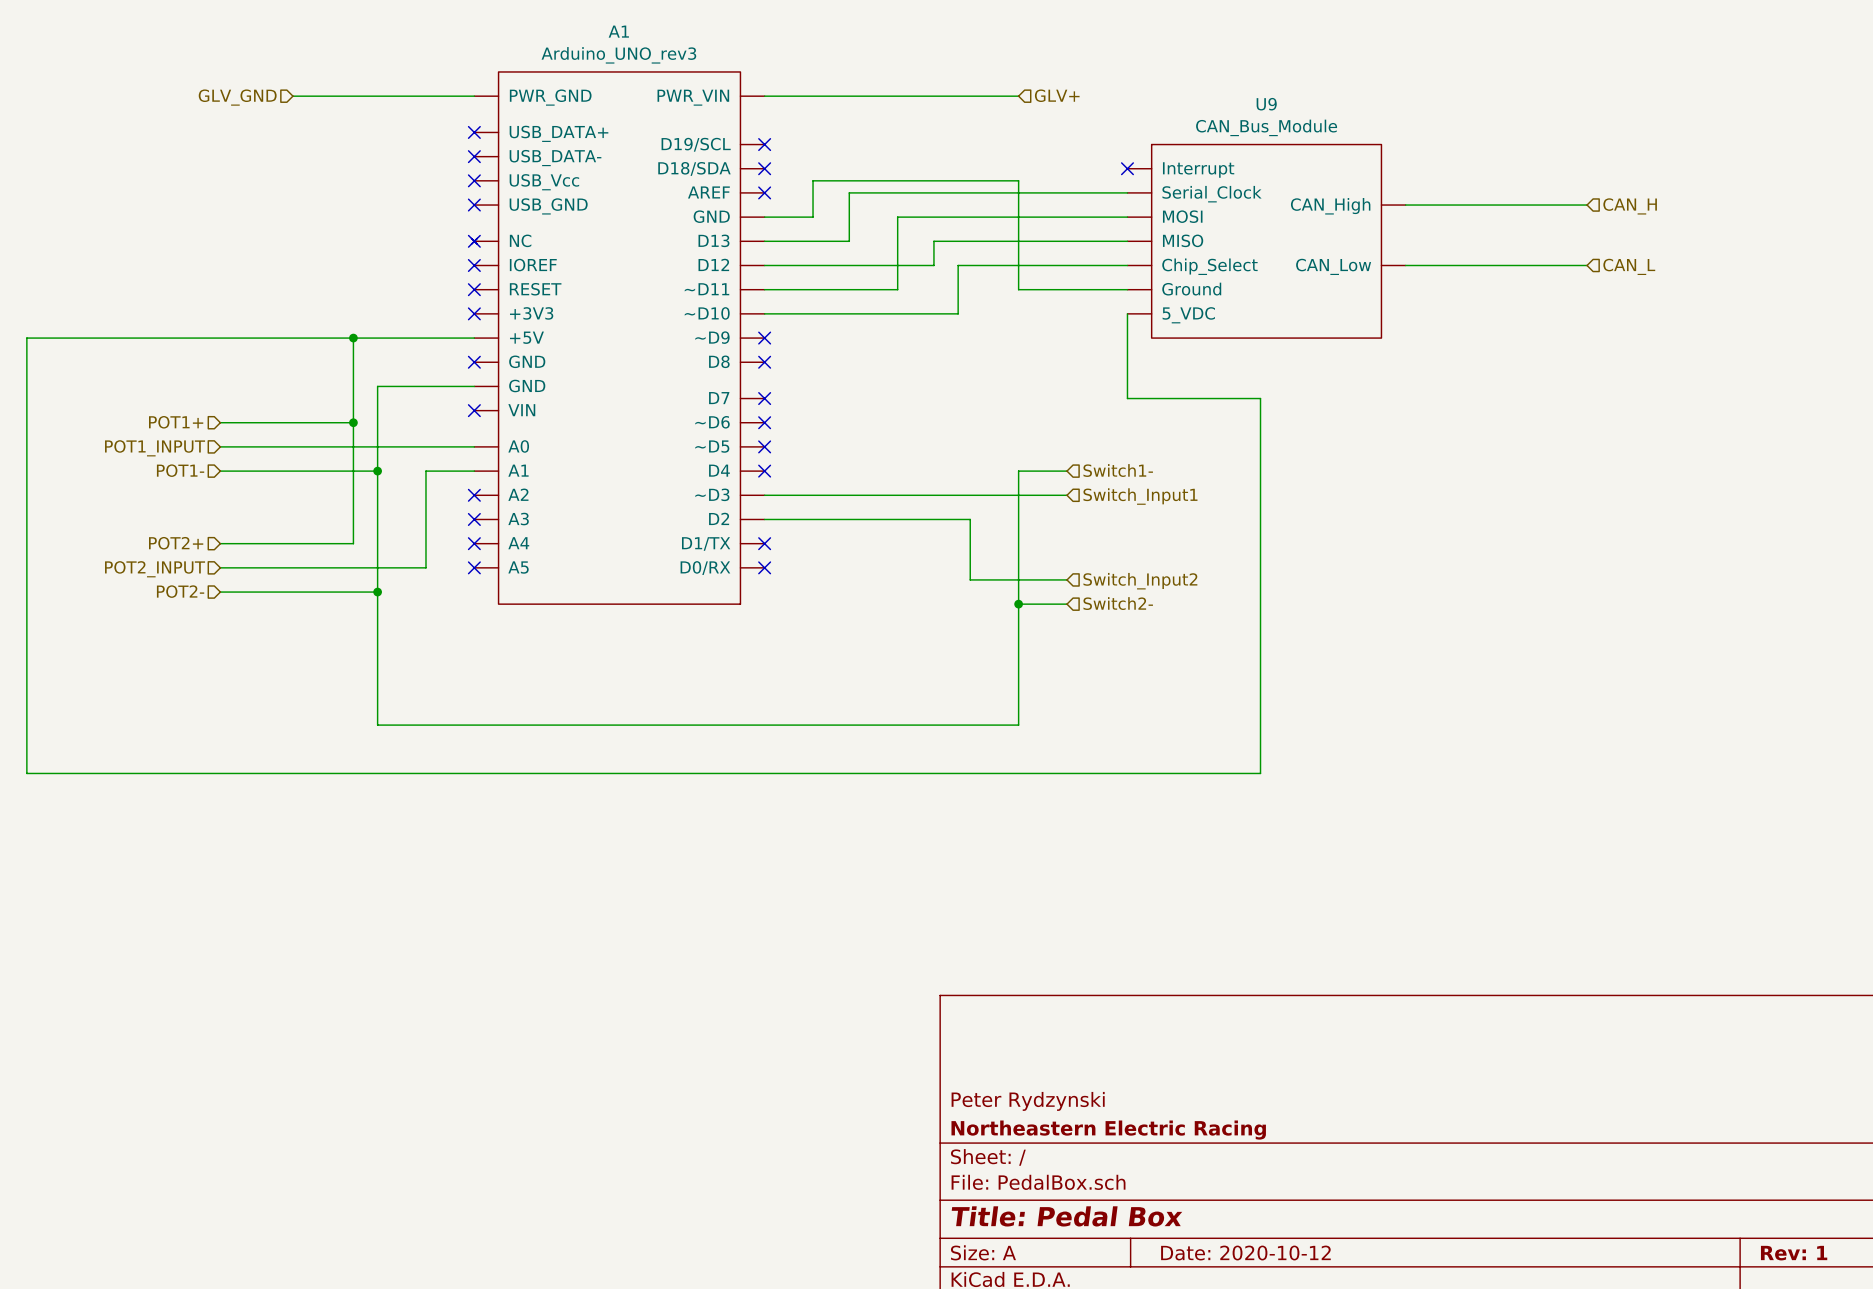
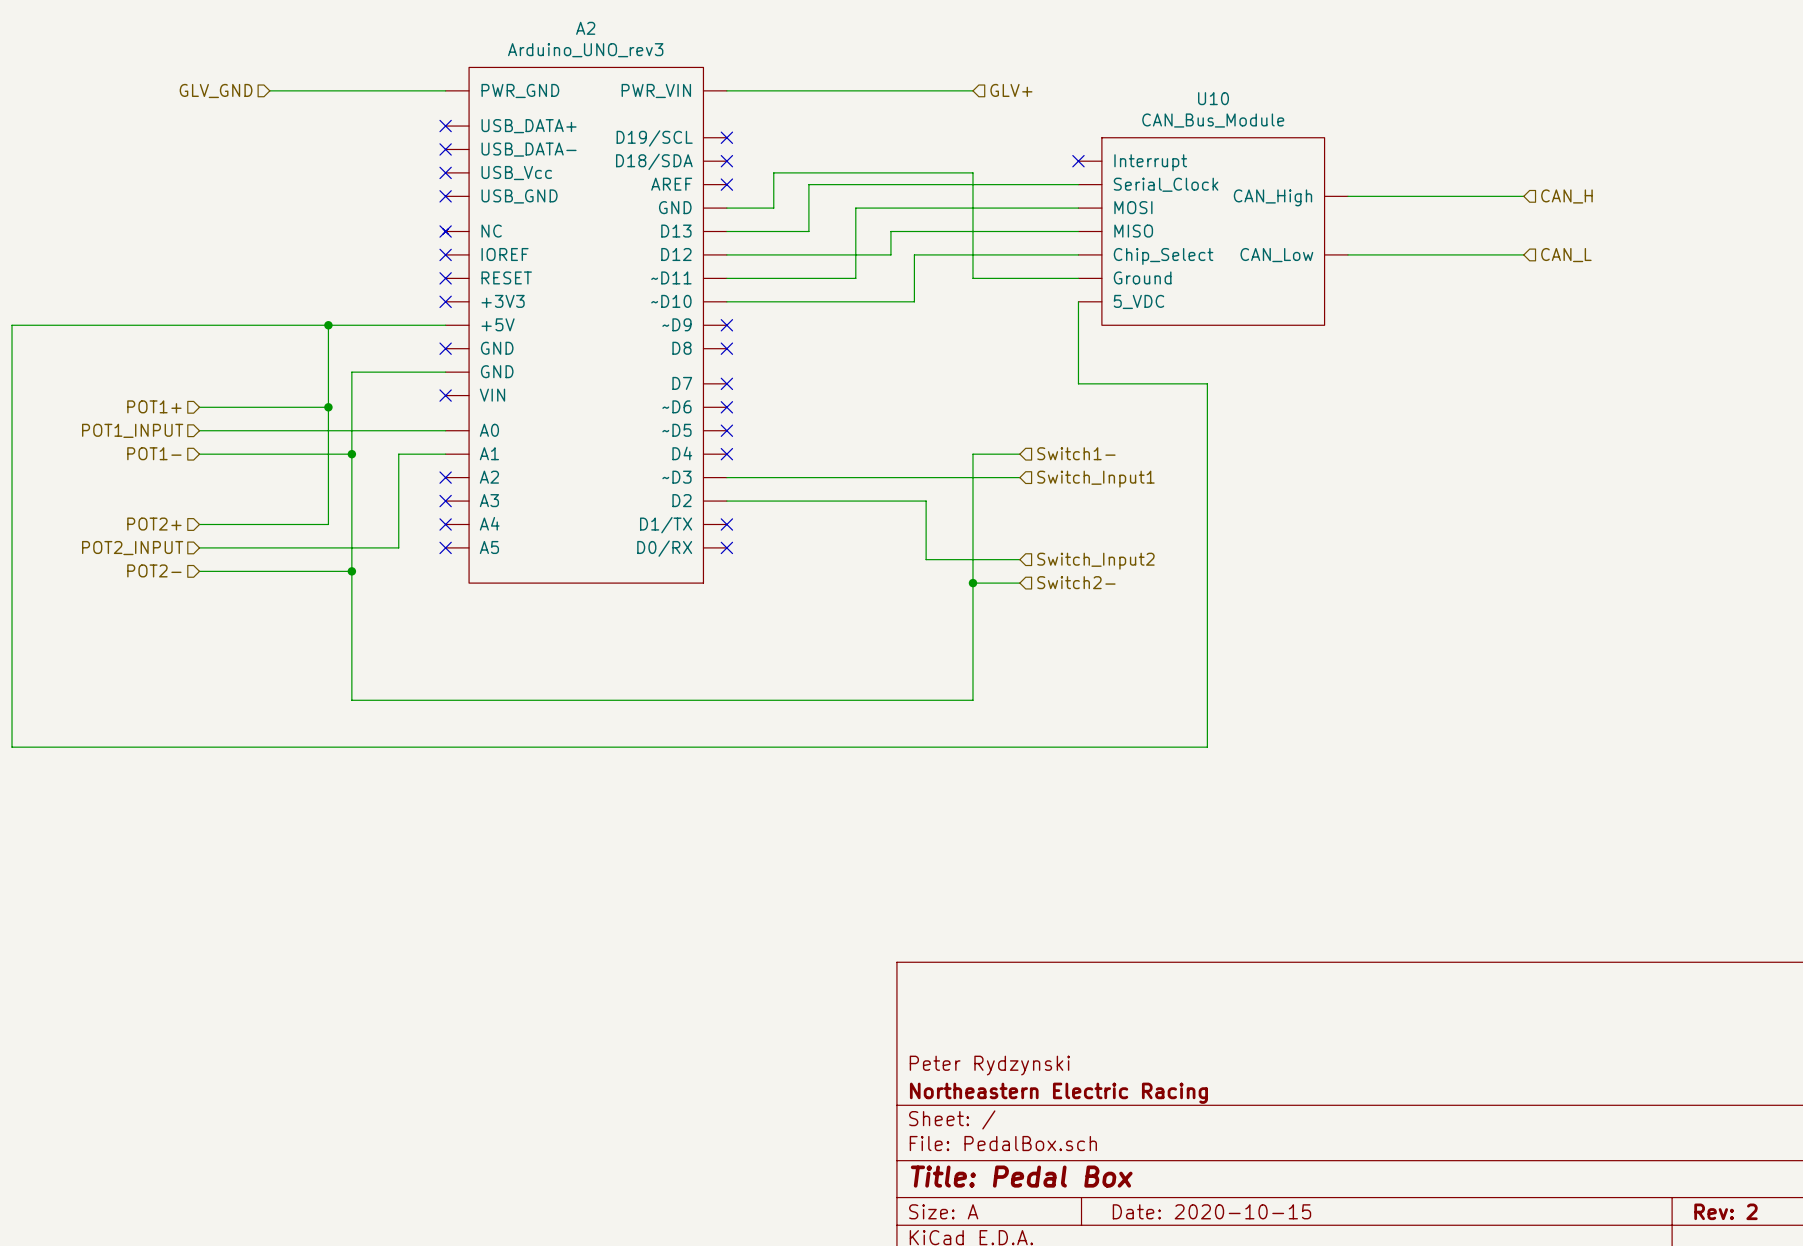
A1 name: A1 (618, 31) -> A2 (585, 28)
U9 name: U9 (1266, 104) -> U10 (1213, 98)
title block: Date: 2020-10-12 (1245, 1253) -> Date: 2020-10-15 (1211, 1211)
title block: Rev: 1 (1794, 1253) -> Rev: 2 (1725, 1211)

